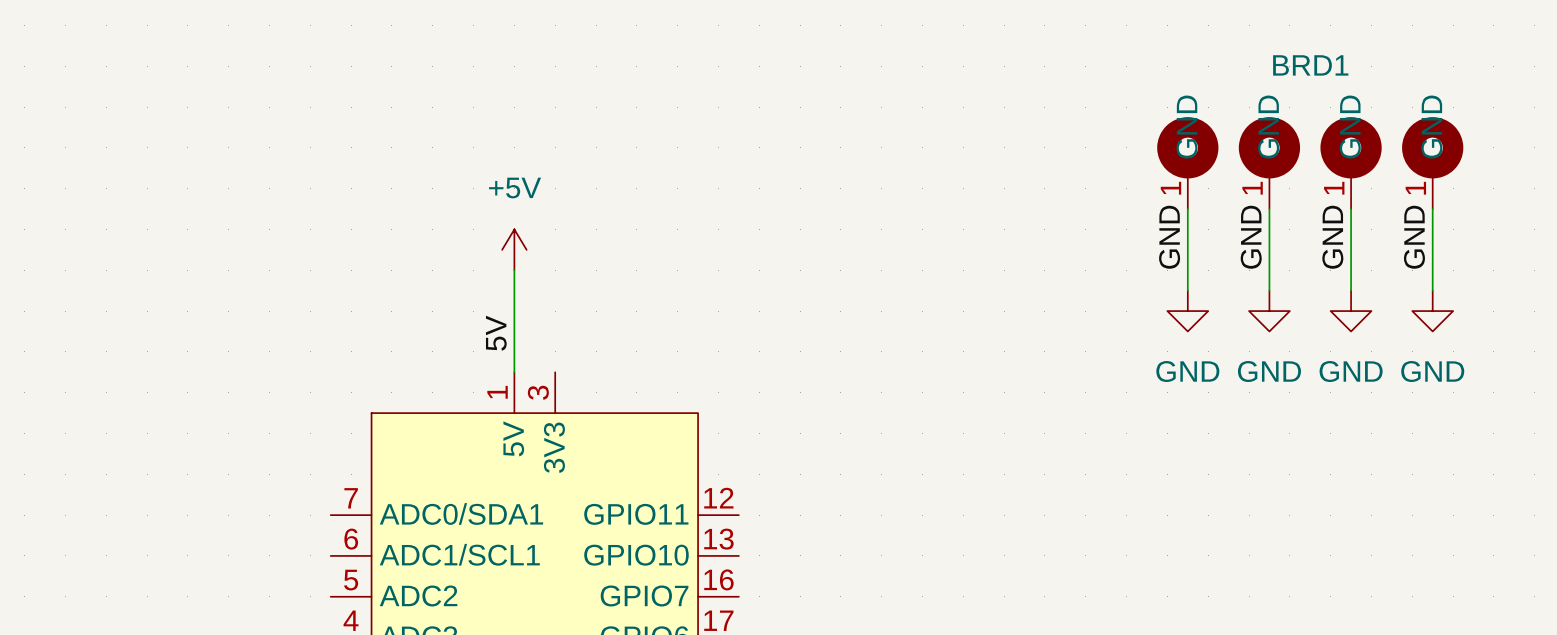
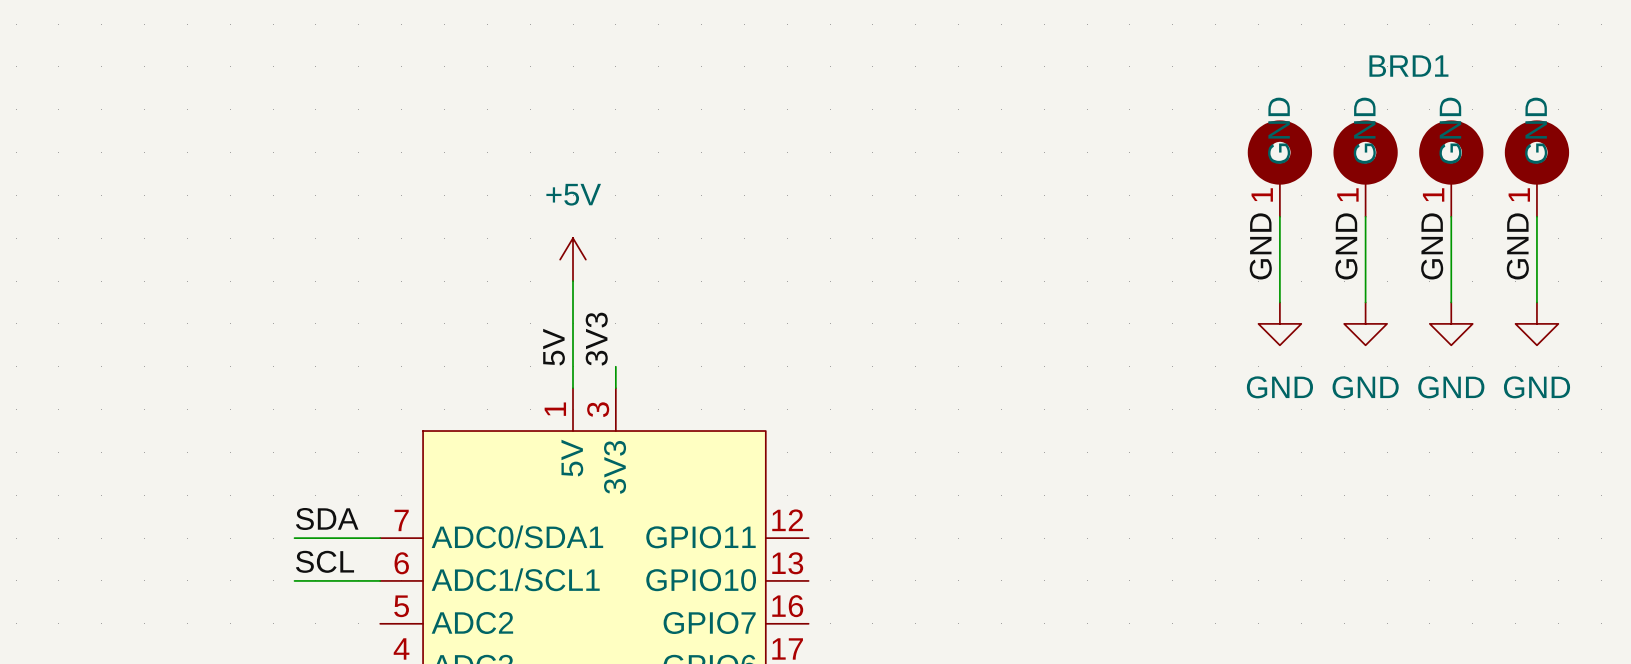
label: none -> 3V3 (596, 339)
wire: none -> (615, 366) (615, 388)
label: none -> SDA (327, 518)
wire: none -> (294, 538) (380, 538)
label: none -> SCL (325, 561)
wire: none -> (294, 580) (380, 580)

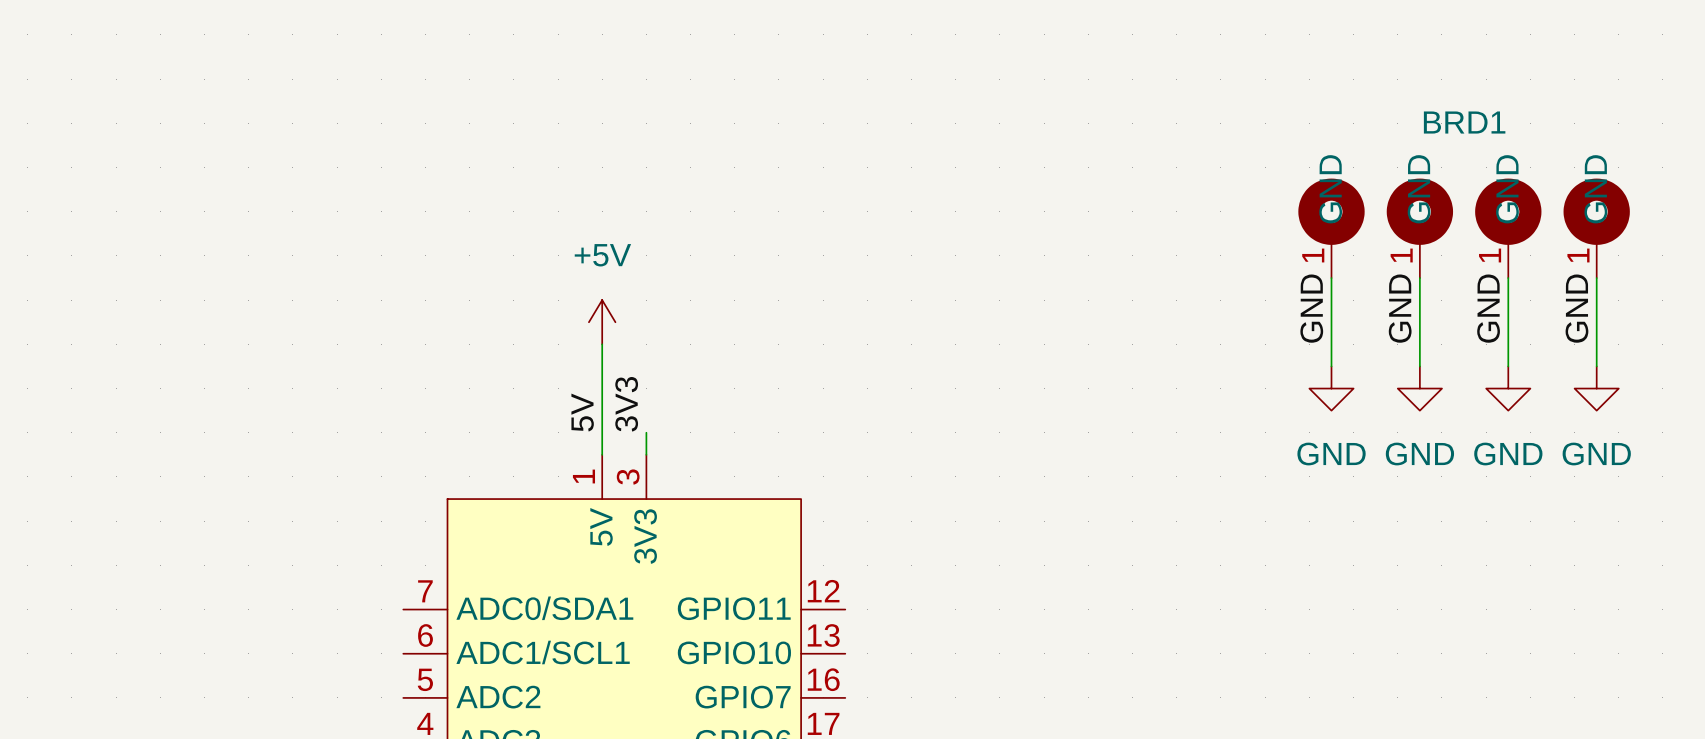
label: SDA (327, 518) -> none
wire: (294, 538) (380, 538) -> none
label: SCL (325, 561) -> none
wire: (294, 580) (380, 580) -> none

